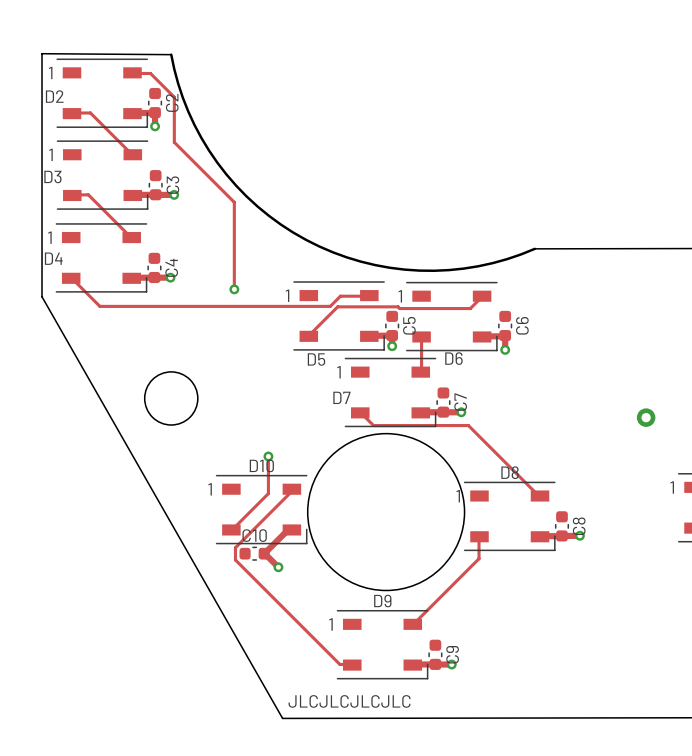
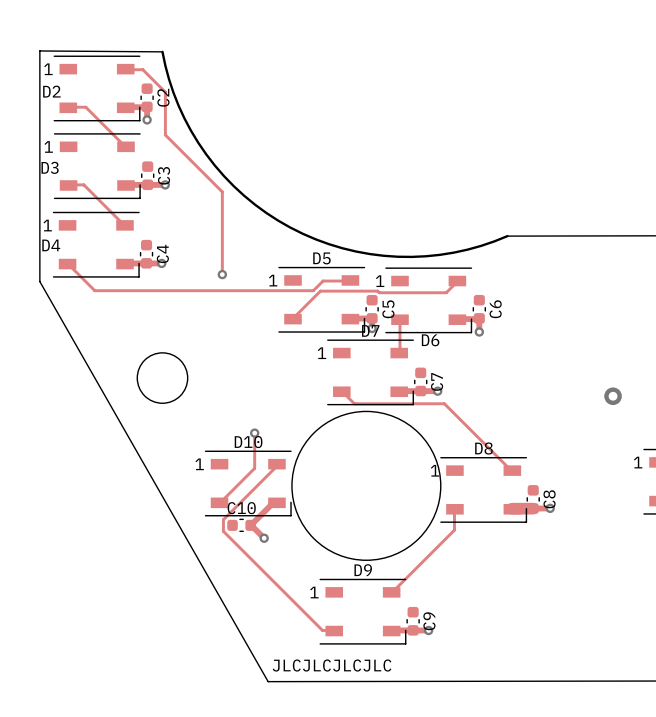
D5 name position: D5 (316, 359) -> D5 (321, 258)
D7 name position: D7 (341, 397) -> D7 (370, 330)

